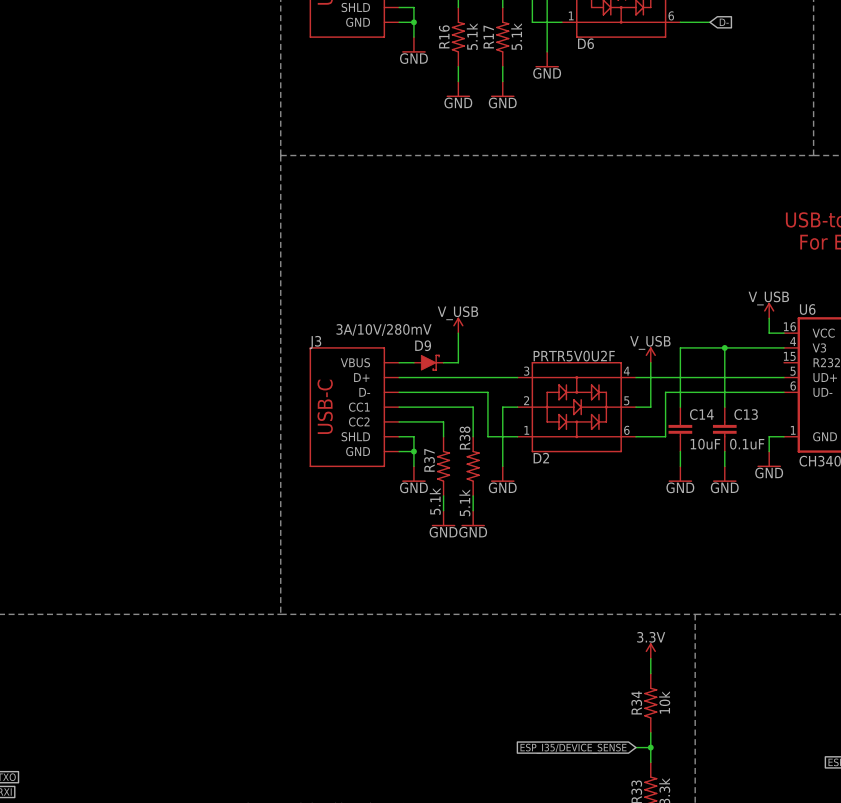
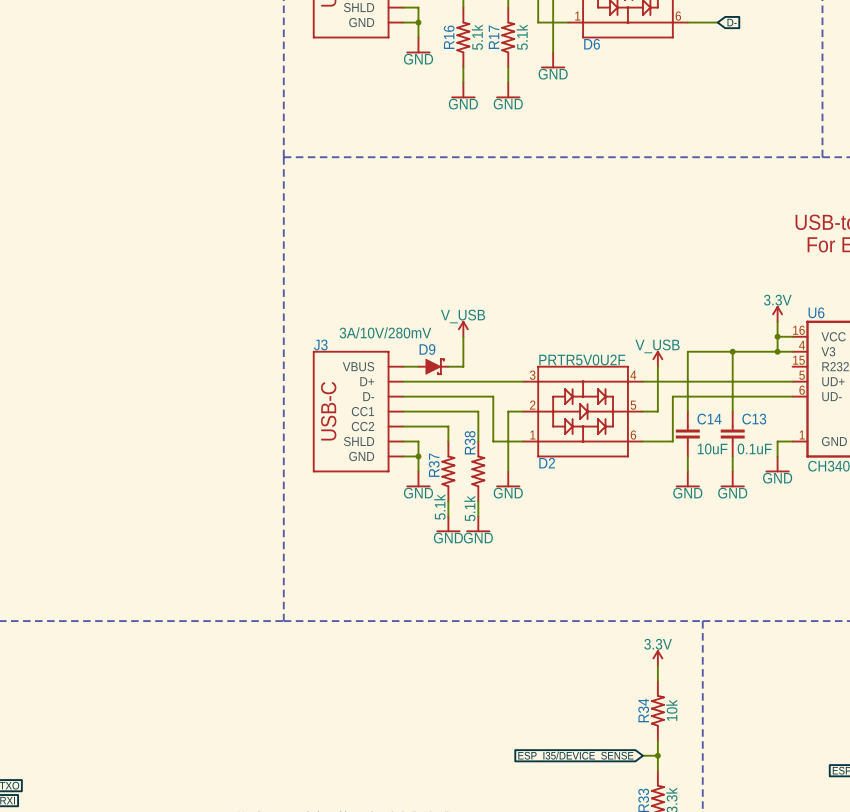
power symbol: V_USB (769, 310) -> 3.3V (777, 313)
wire: none -> (777, 336) (777, 351)
junction: none -> (777, 336)
junction: none -> (777, 351)

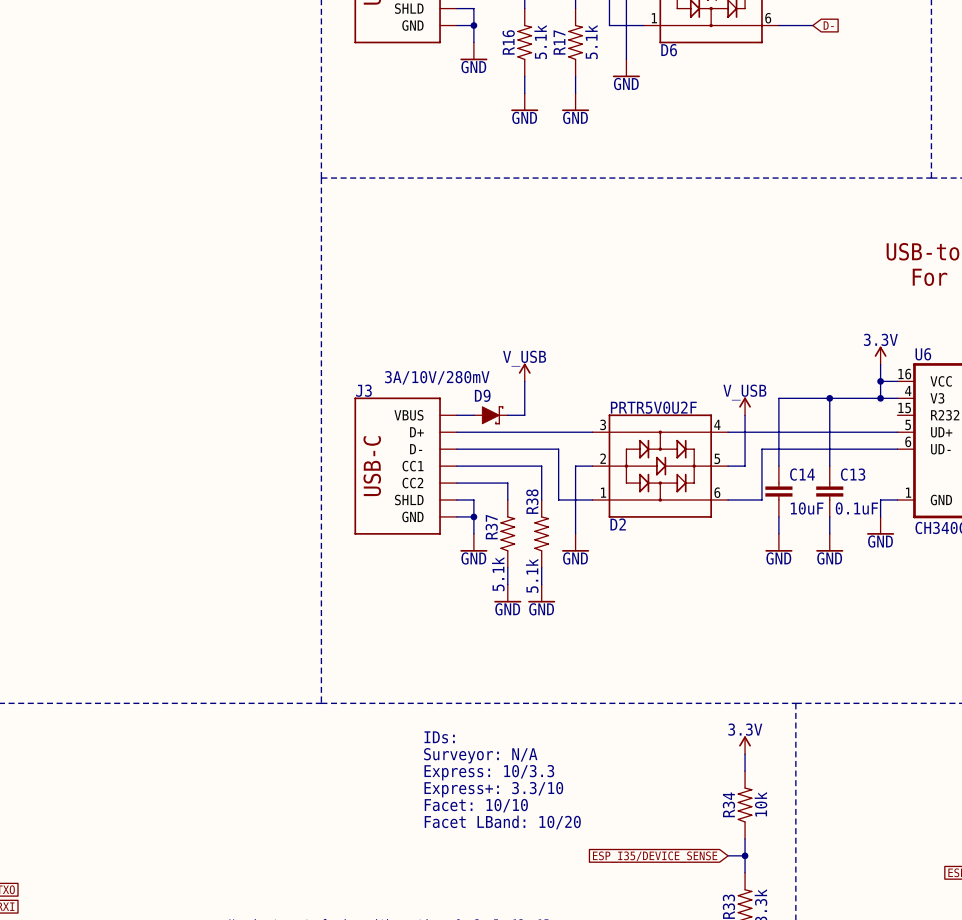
text: none -> IDs: (439, 737)
text: none -> Surveyor: N/A (480, 755)
text: none -> Express: 10/3.3 (489, 772)
text: none -> Express+: 3.3/10 (493, 789)
text: none -> Facet: 10/10 (476, 805)
text: none -> Facet LBand: 10/20 (502, 822)

